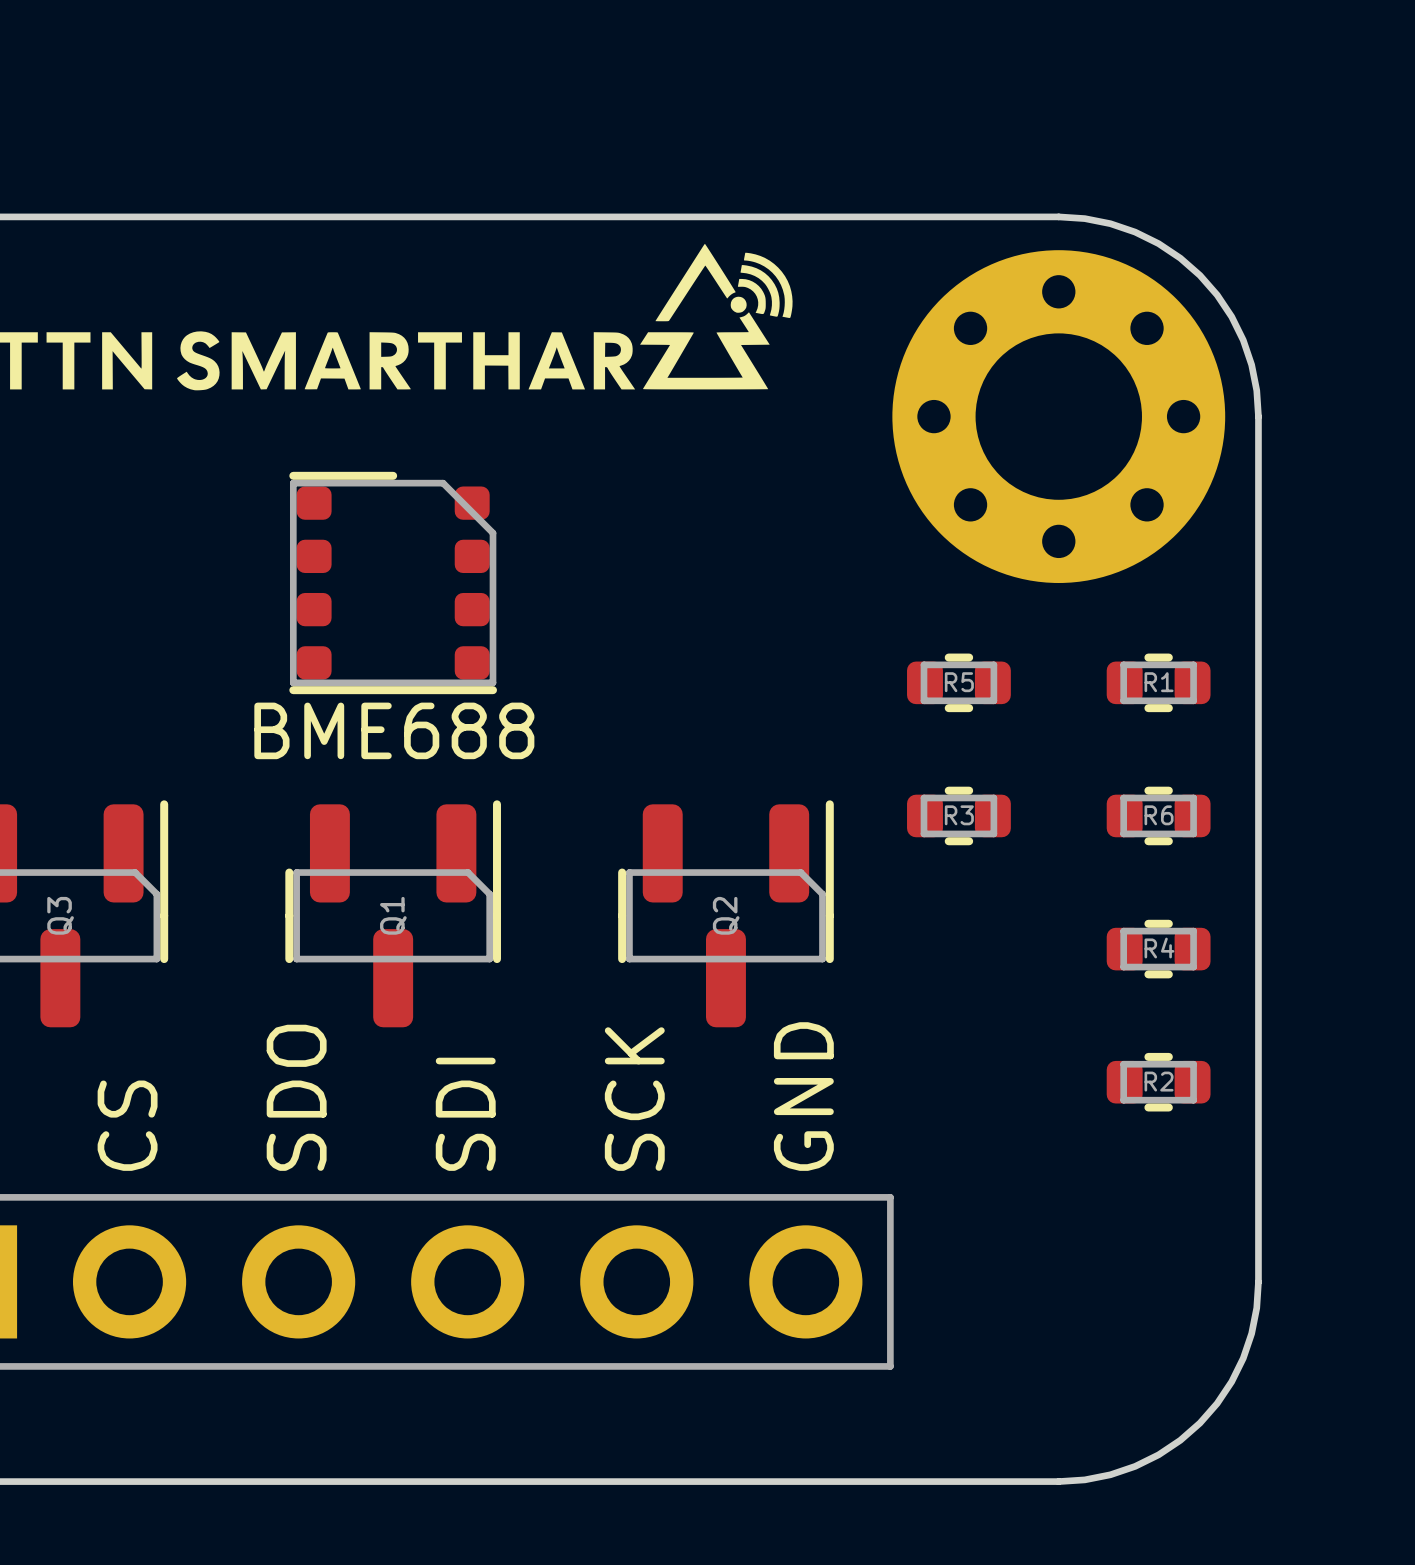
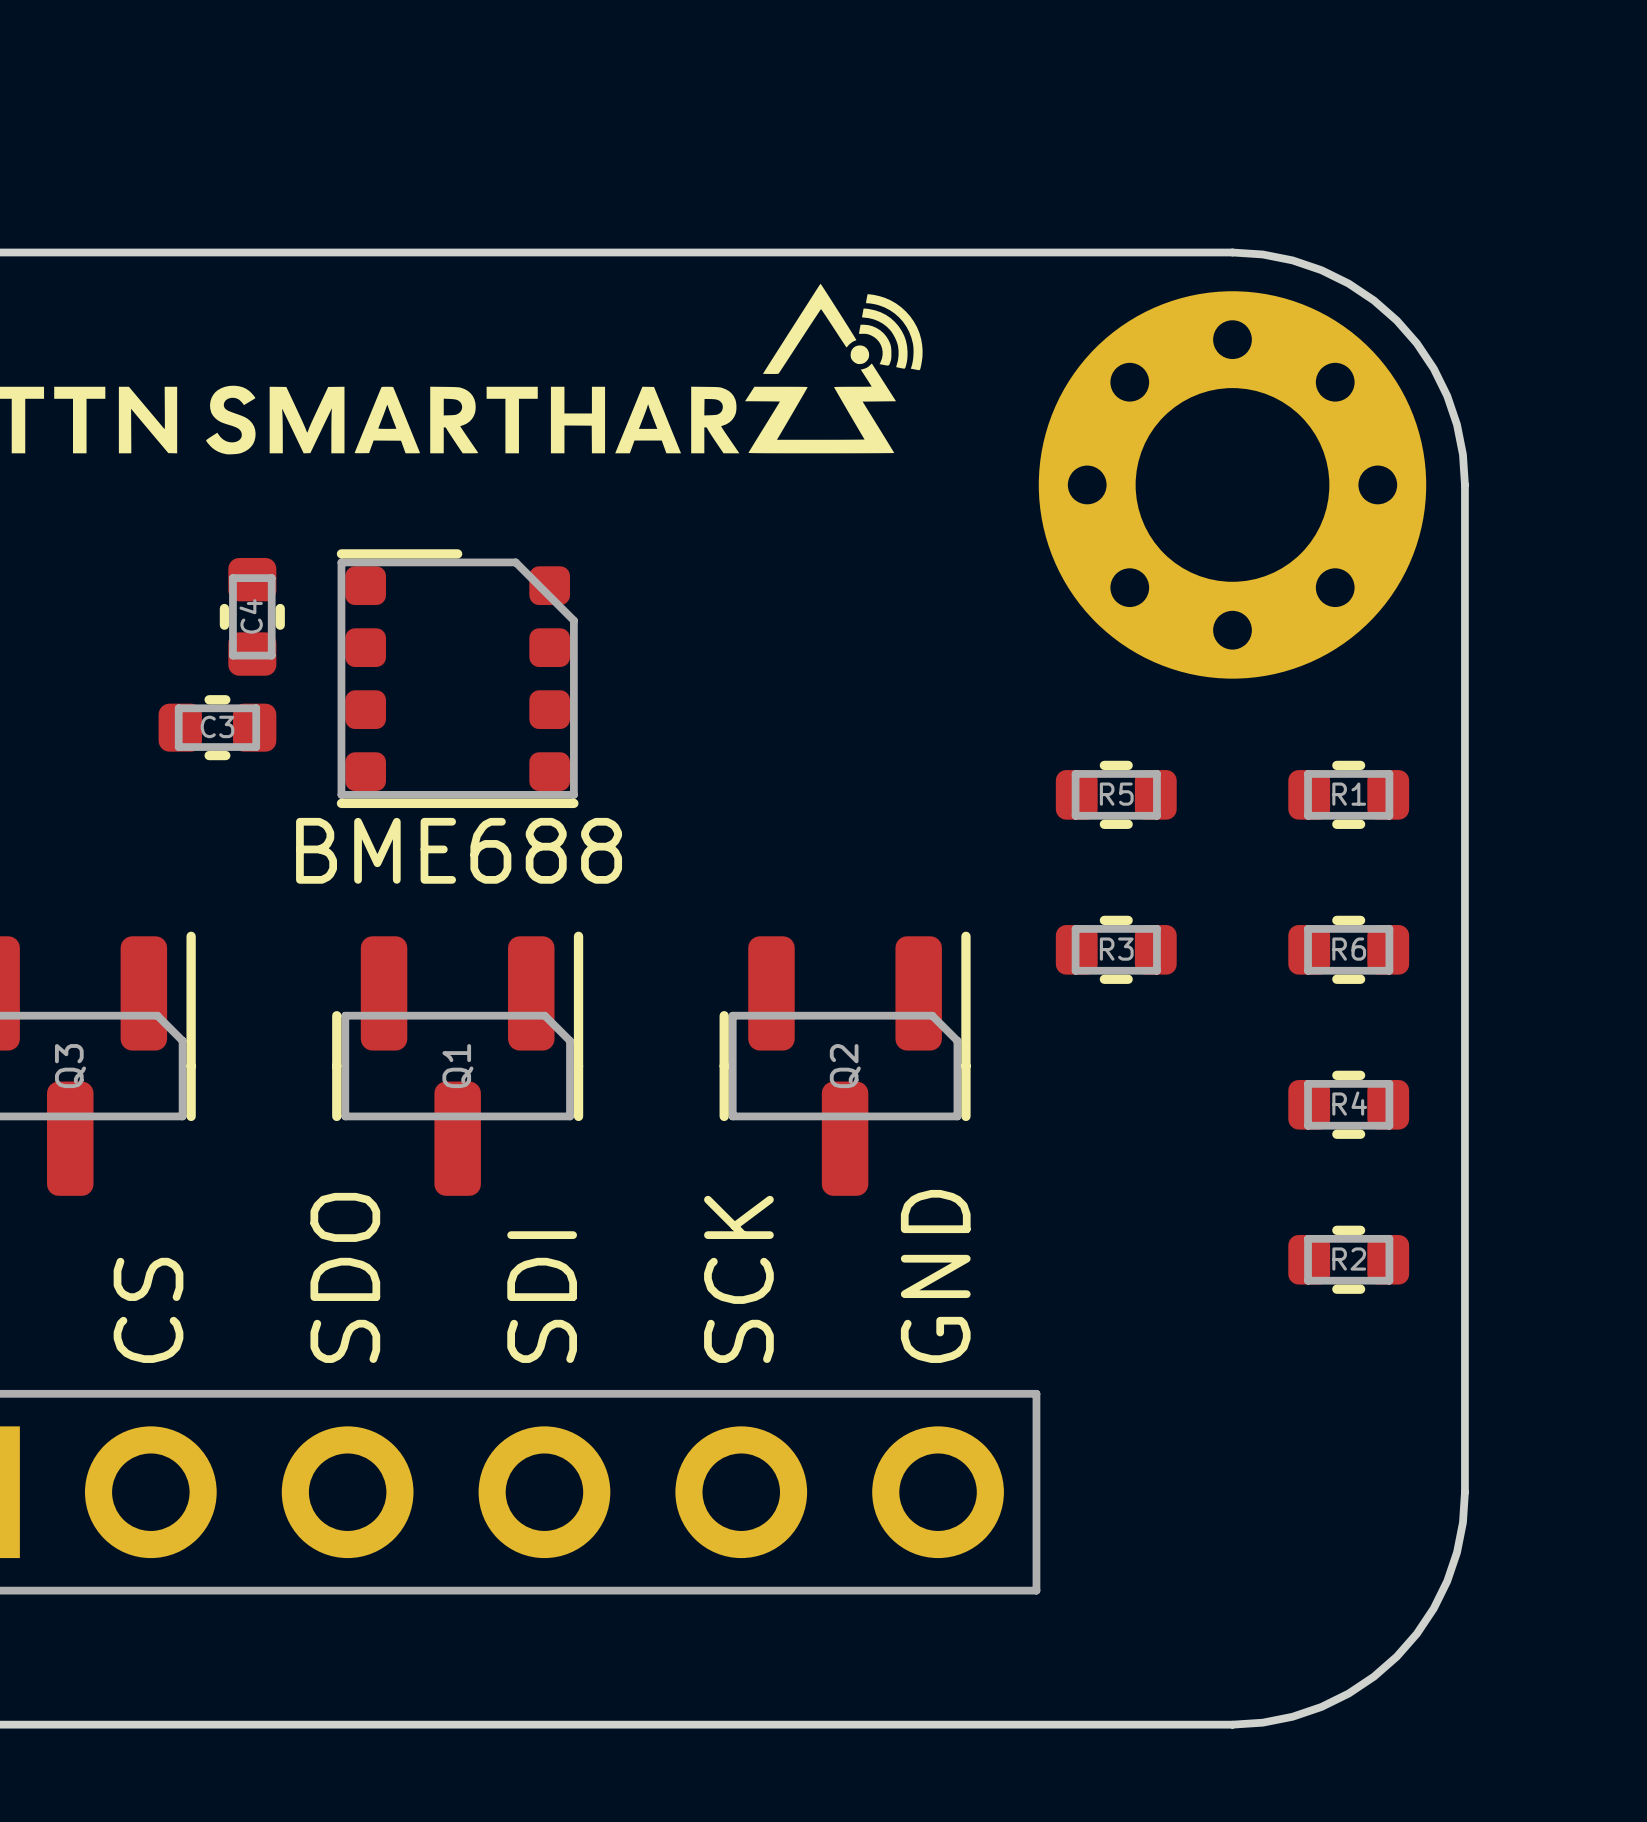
C4: none -> (252, 616)
C3: none -> (217, 727)

